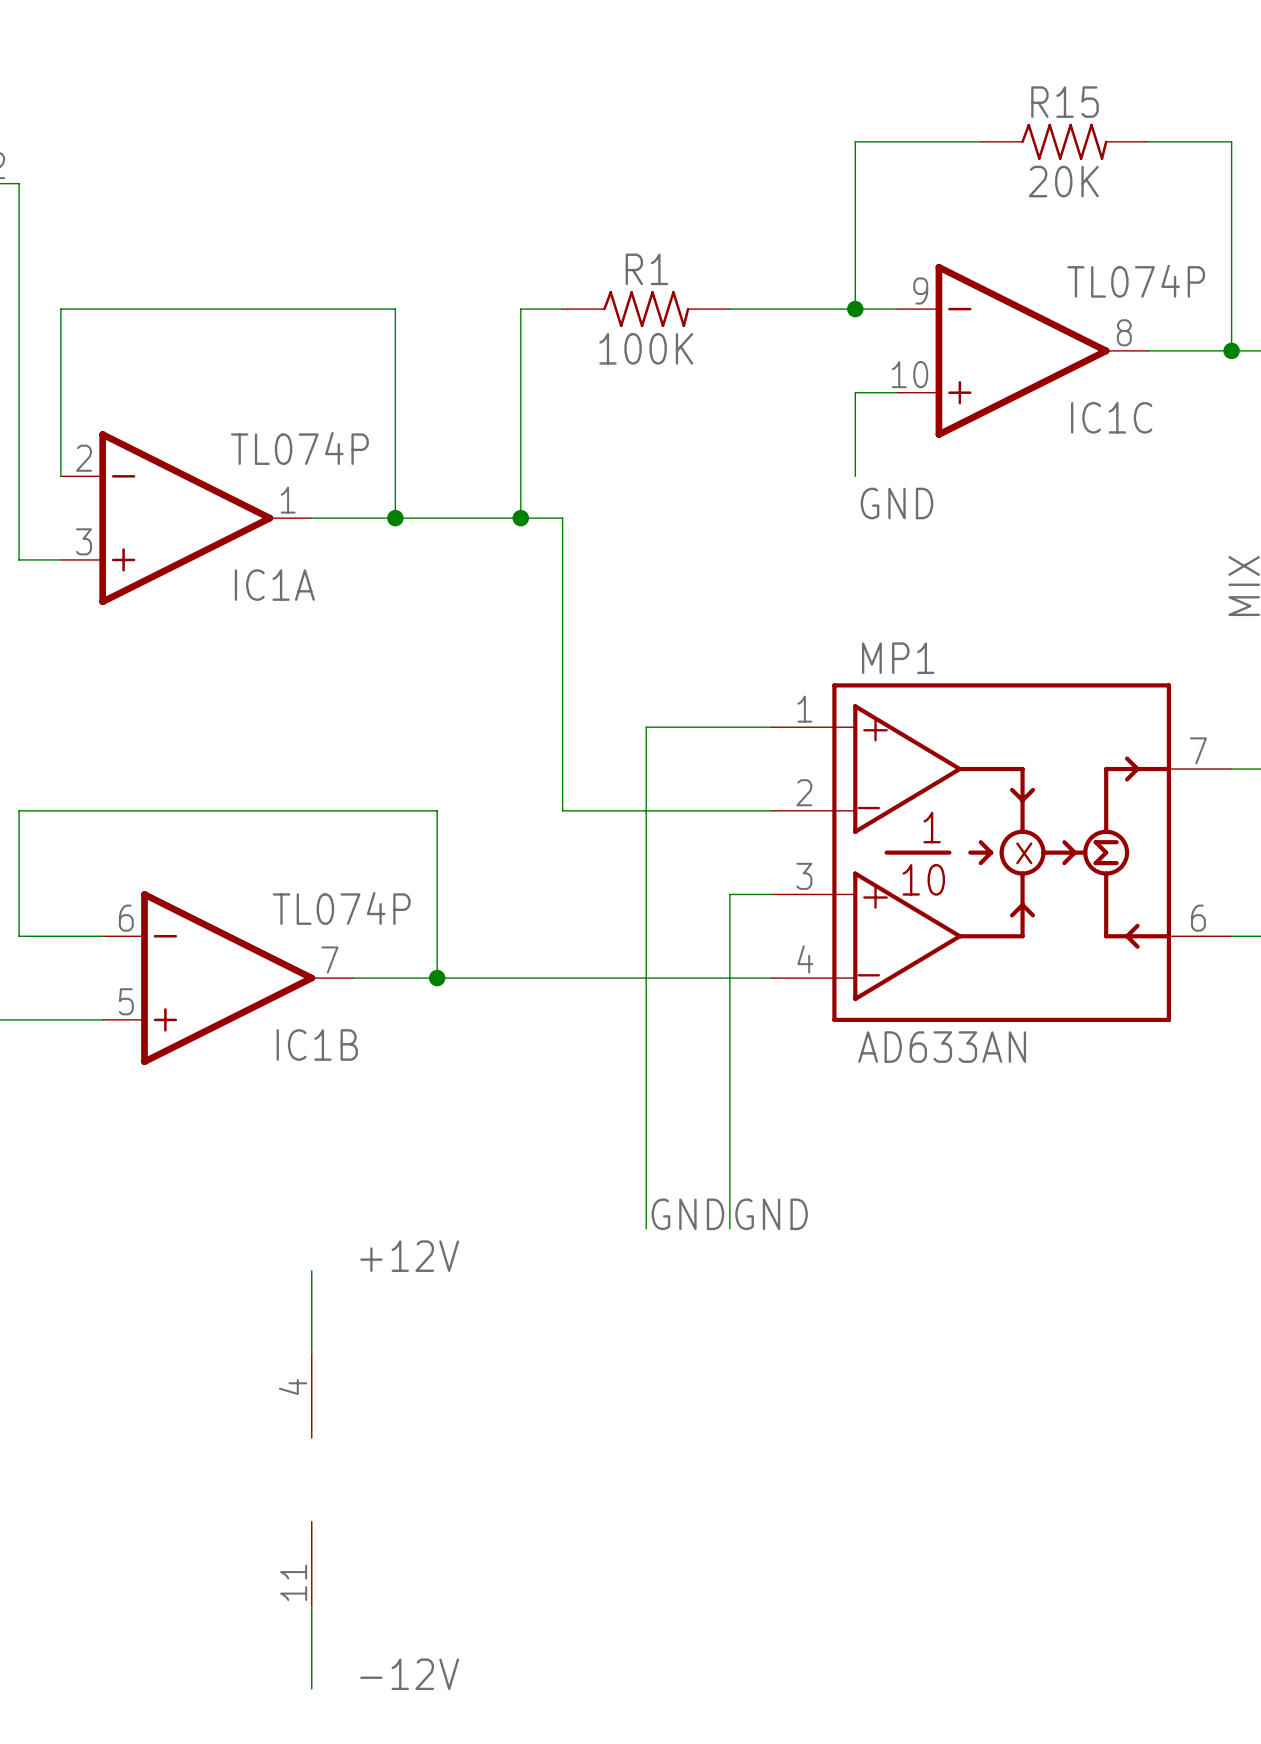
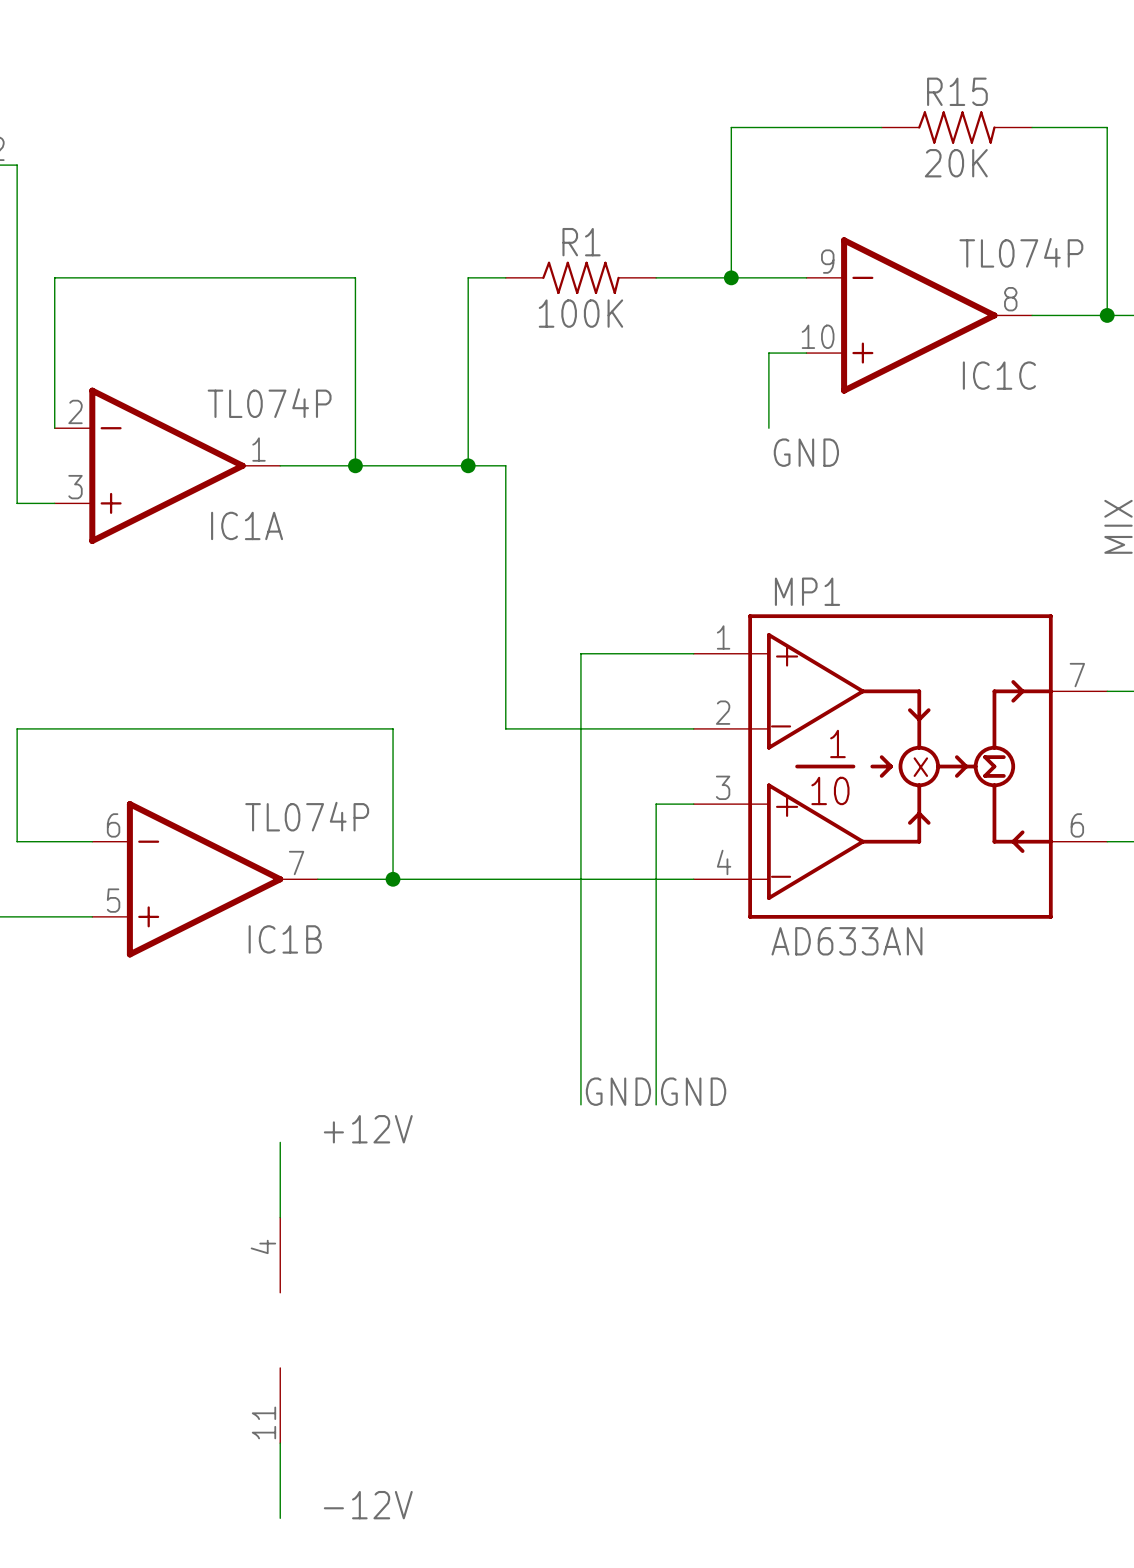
wire: (855, 141) (855, 309) -> (768, 127) (731, 127) (731, 277)
junction position: (855, 309) -> (731, 277)

